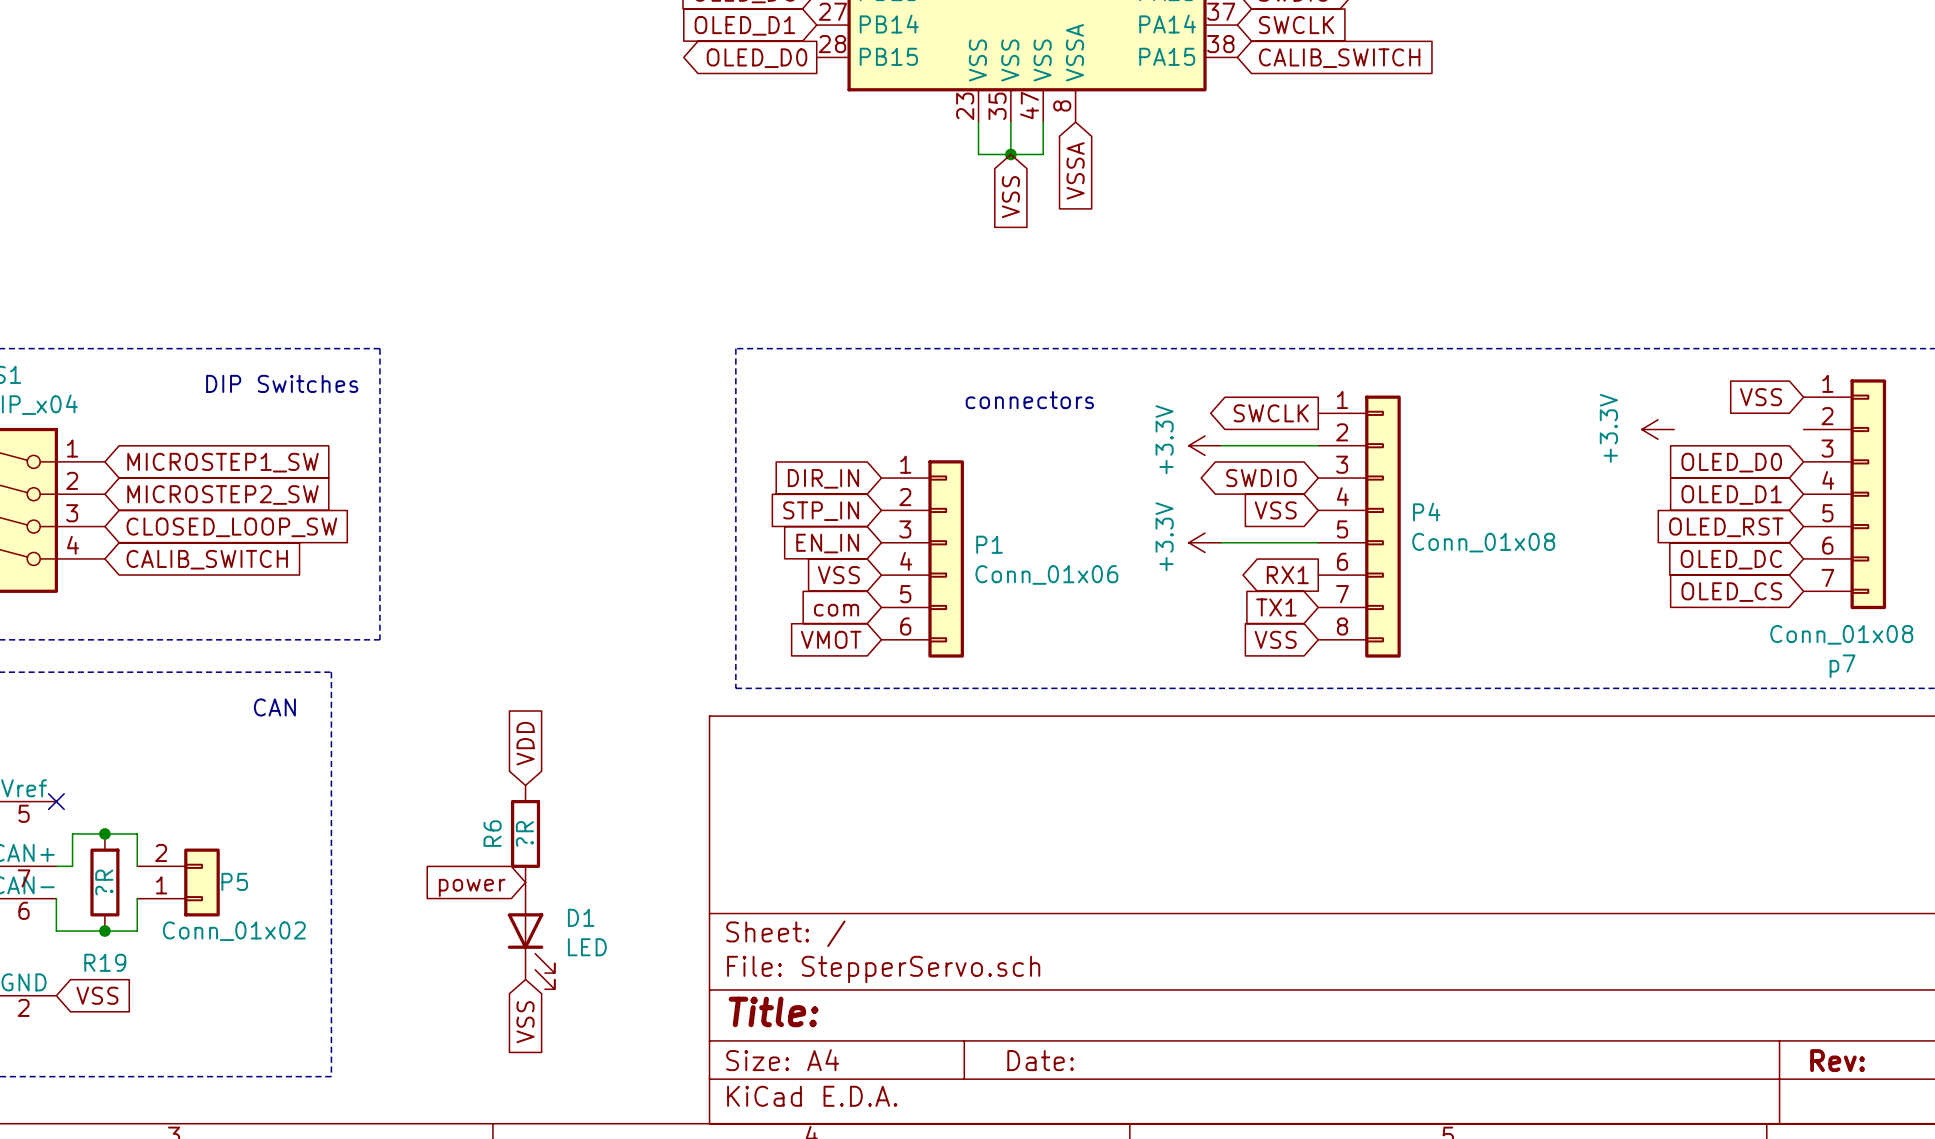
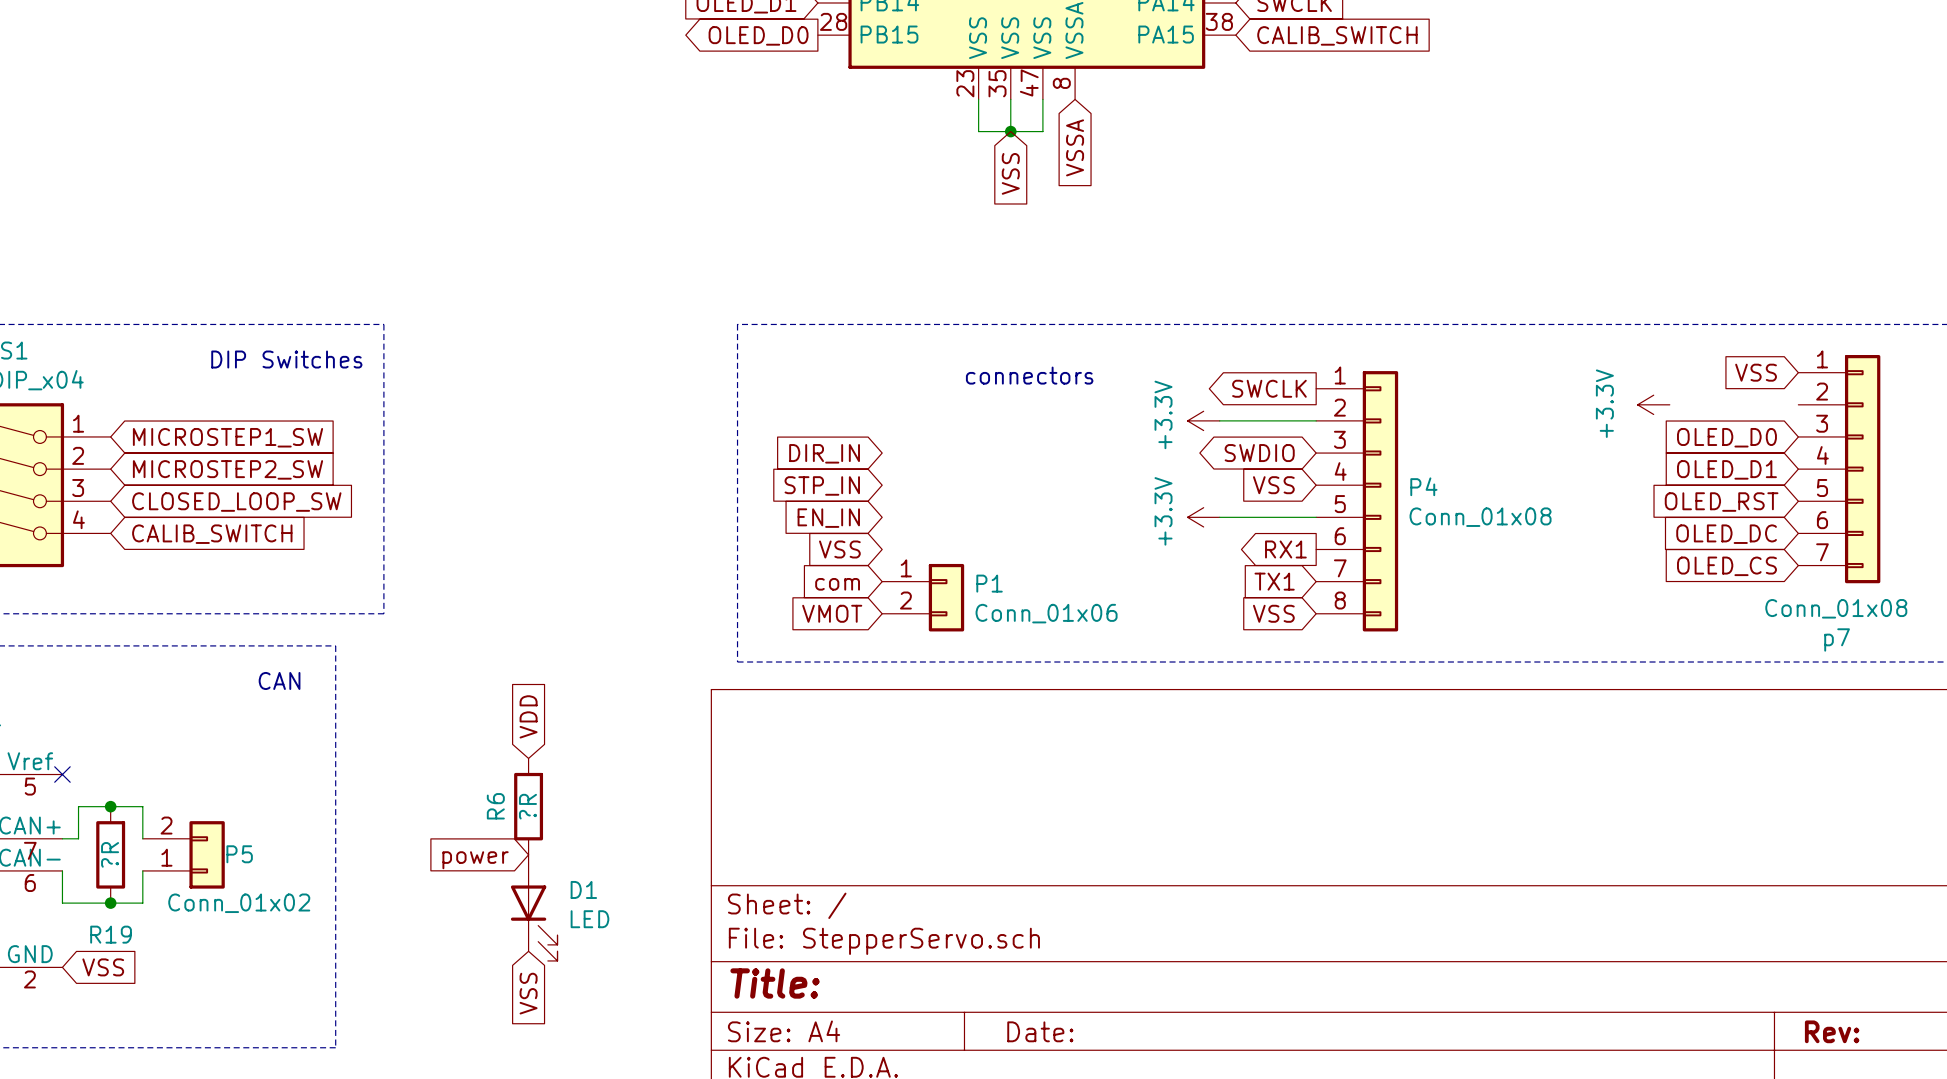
P1 symbol: [881, 460, 964, 658] -> [882, 563, 965, 632]

